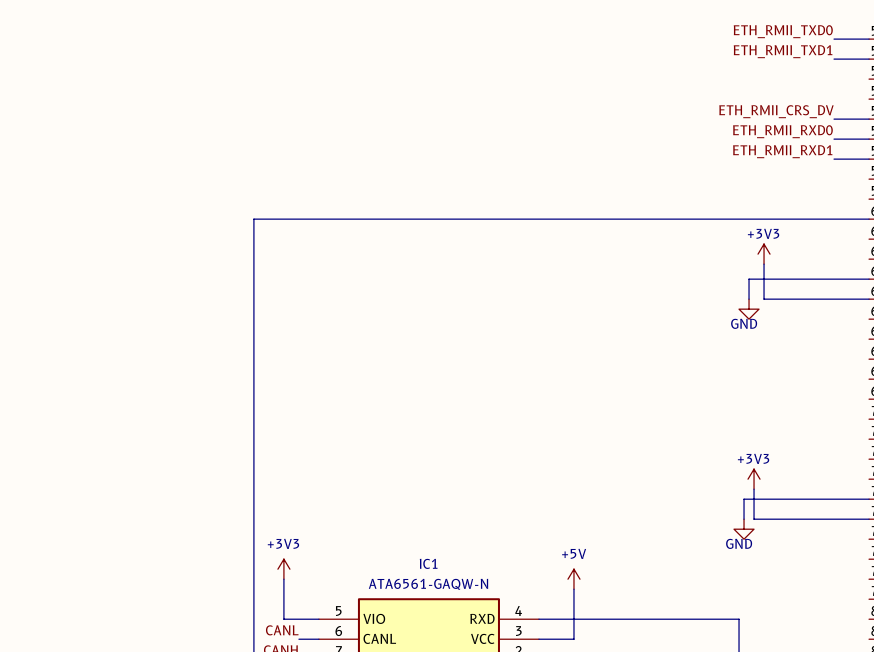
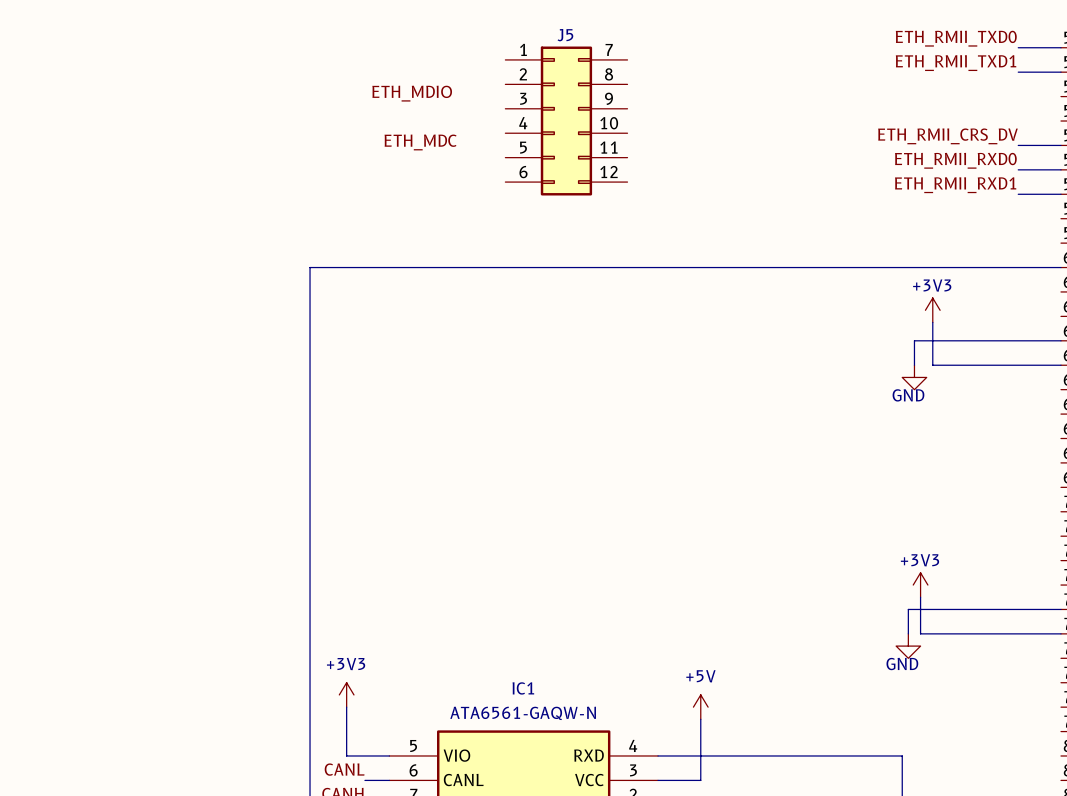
label: none -> ETH_MDIO (412, 93)
J5: none -> (566, 121)
label: none -> ETH_MDC (420, 142)

